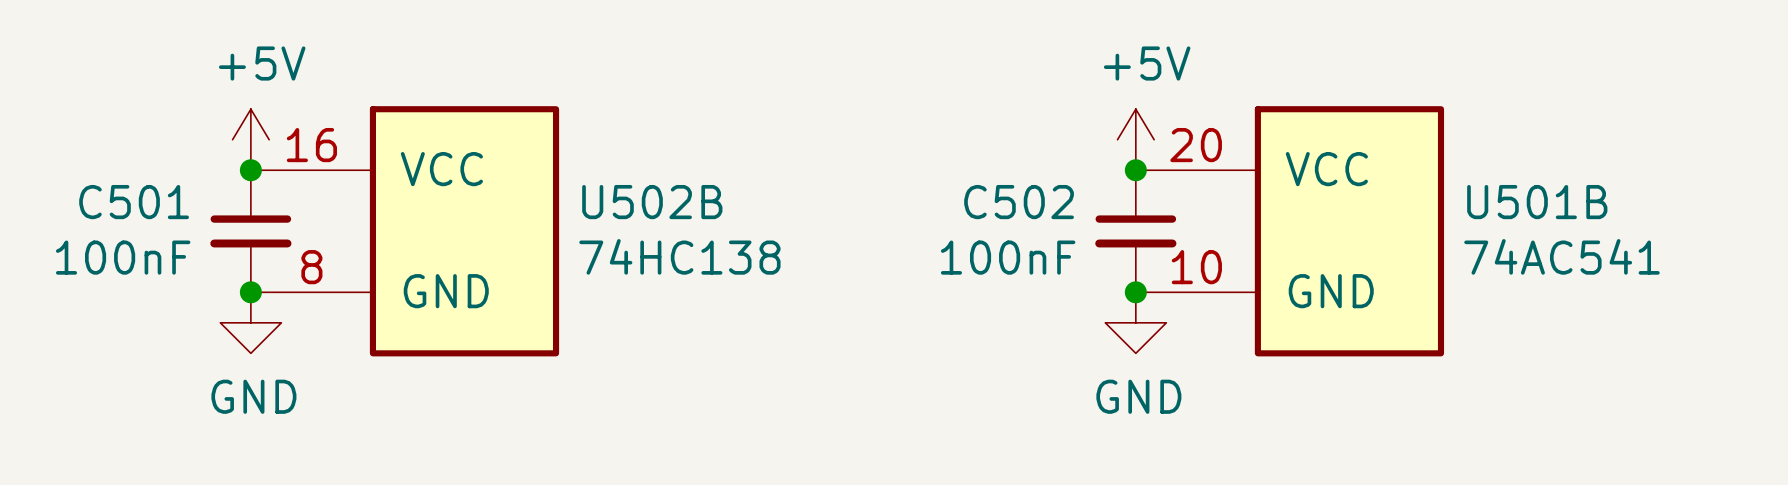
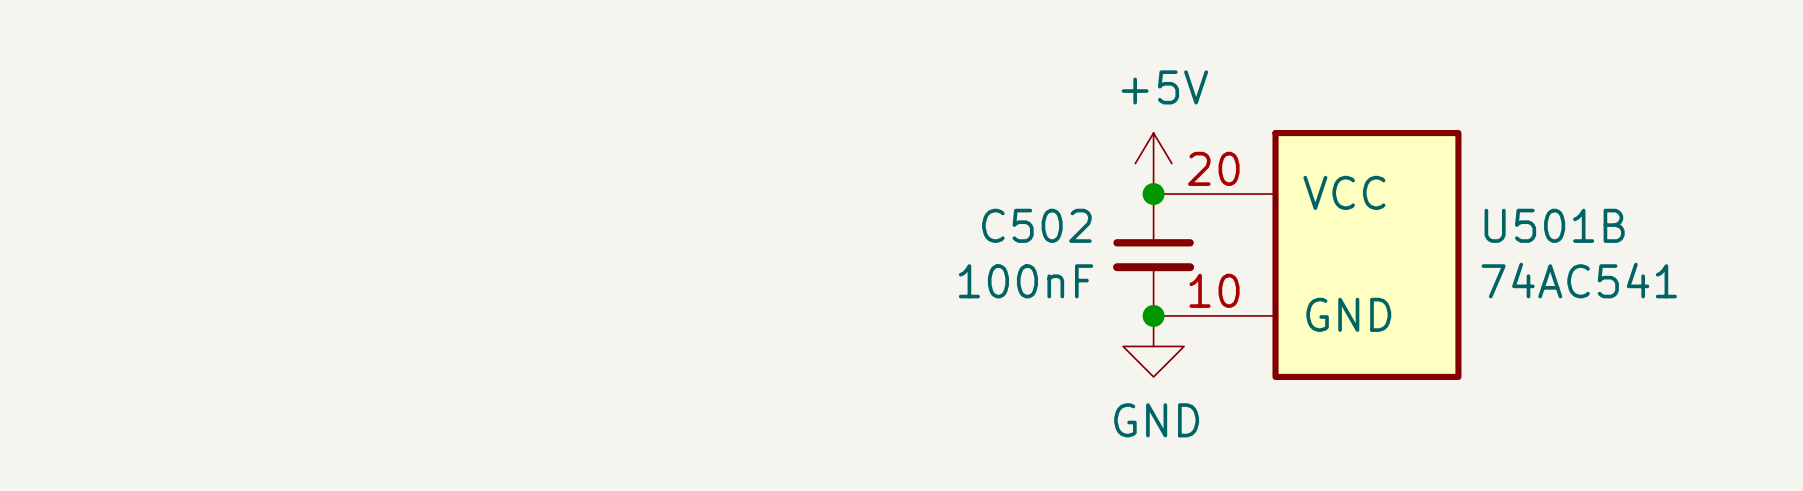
power symbol: +5V (250, 139) -> none
junction: (250, 170) -> none
C501: 100nF (250, 231) -> none
U502B: 74HC138 (404, 231) -> none
junction: (250, 292) -> none
power symbol: GND (250, 322) -> none

